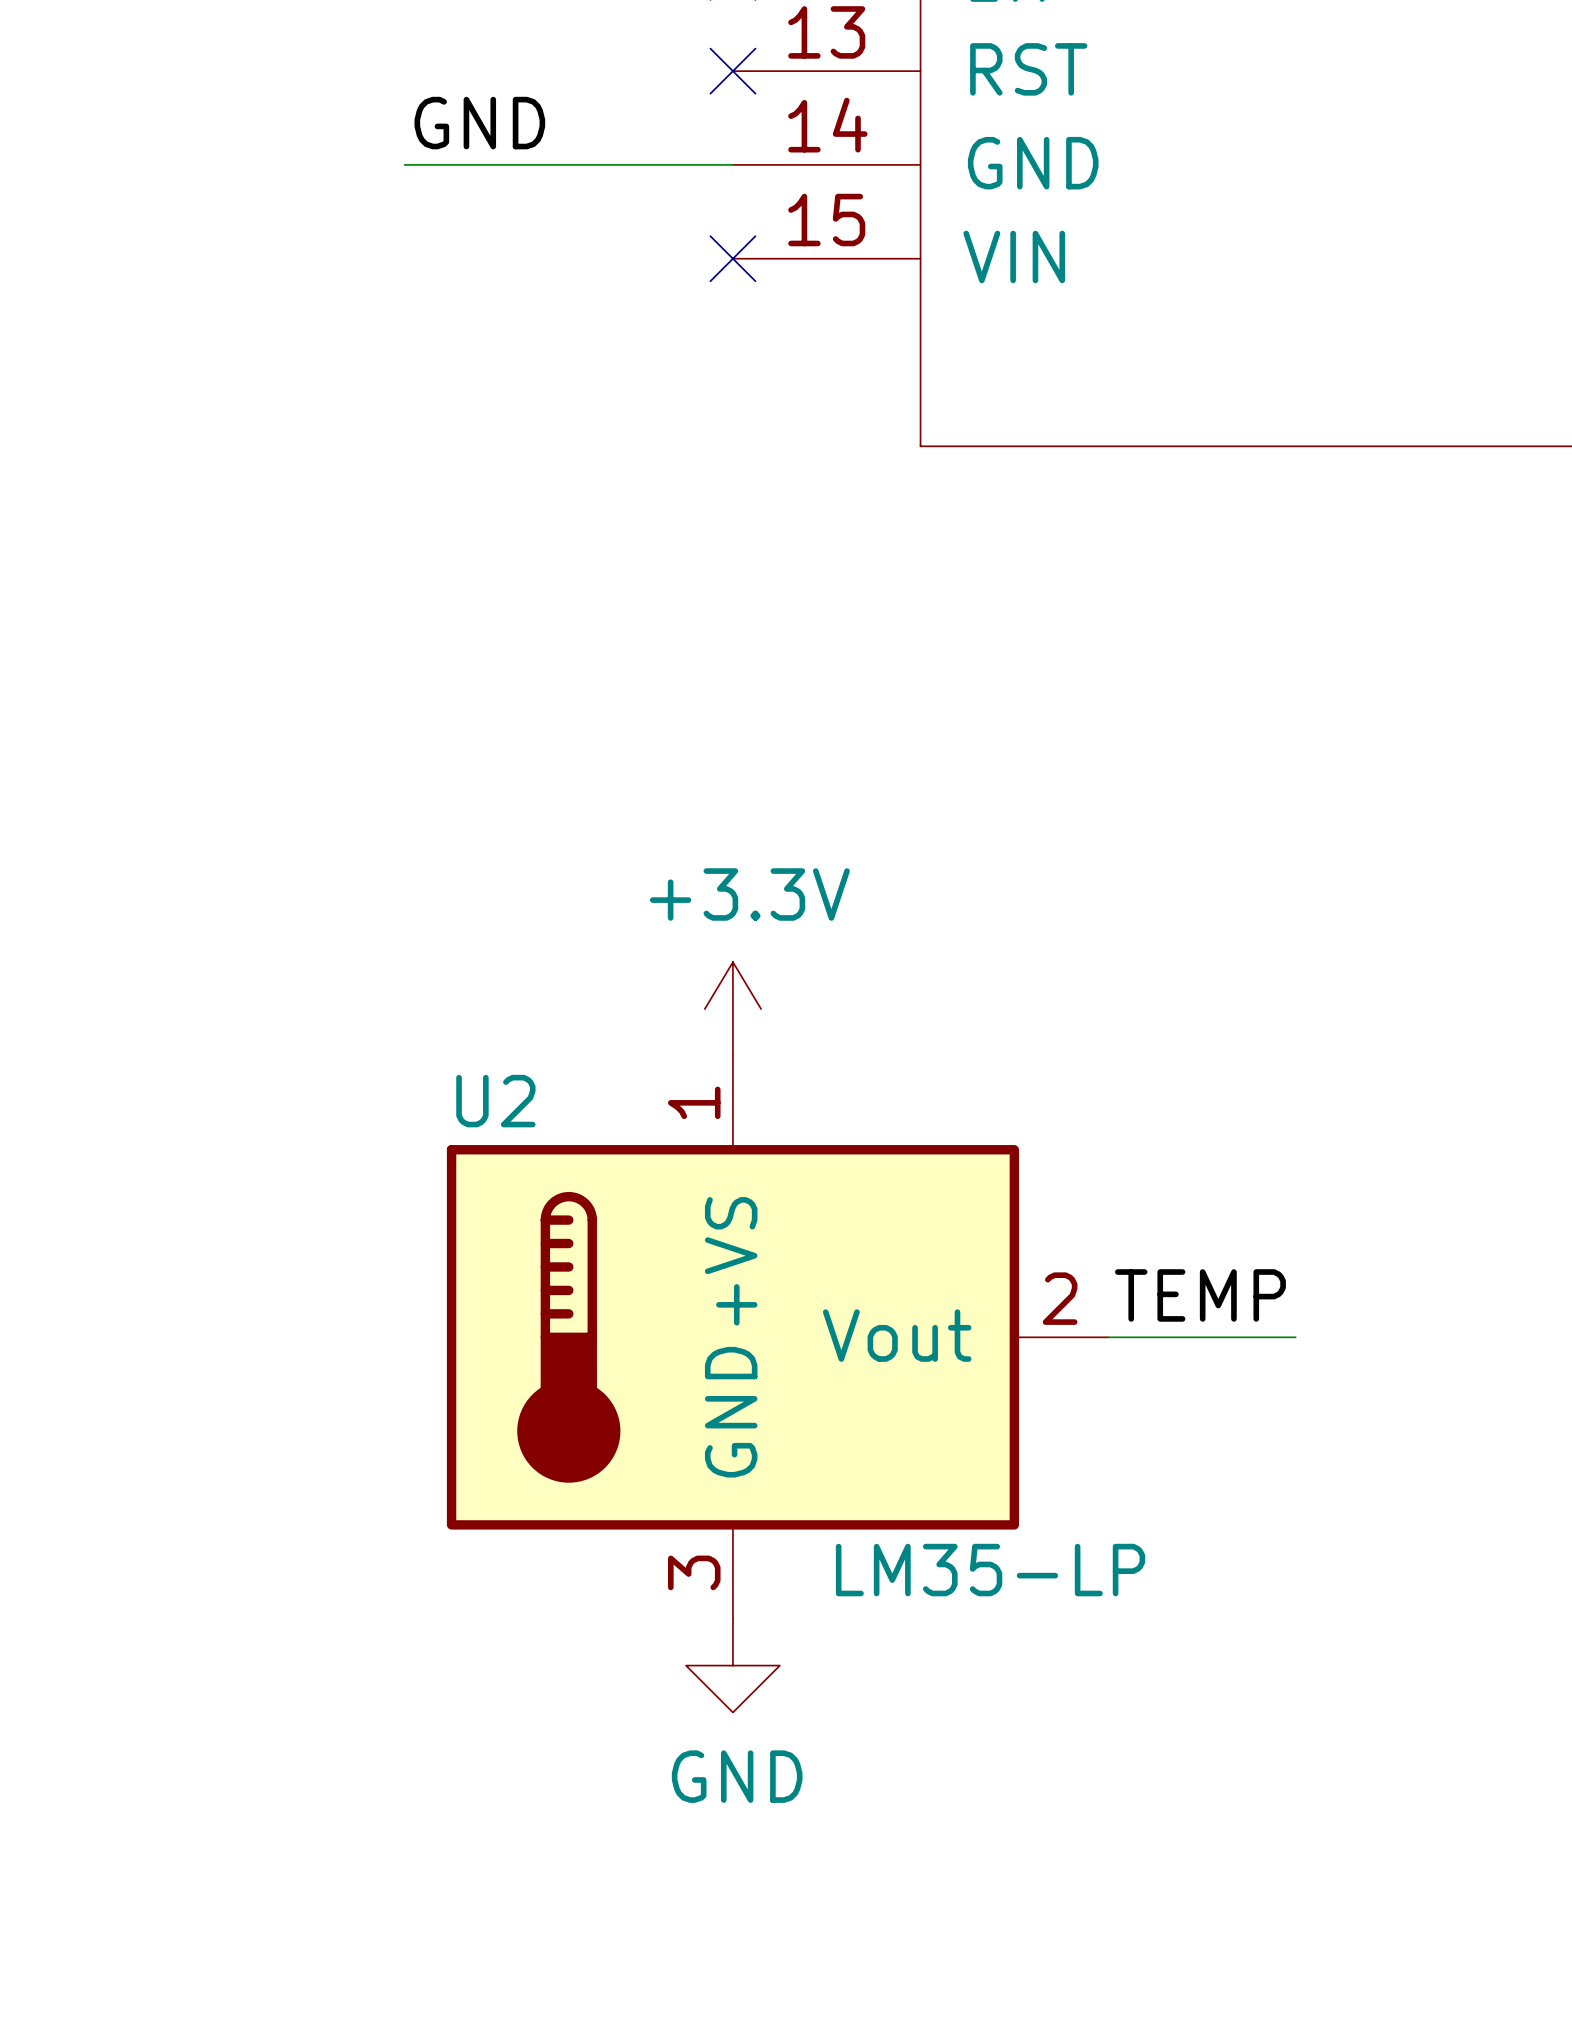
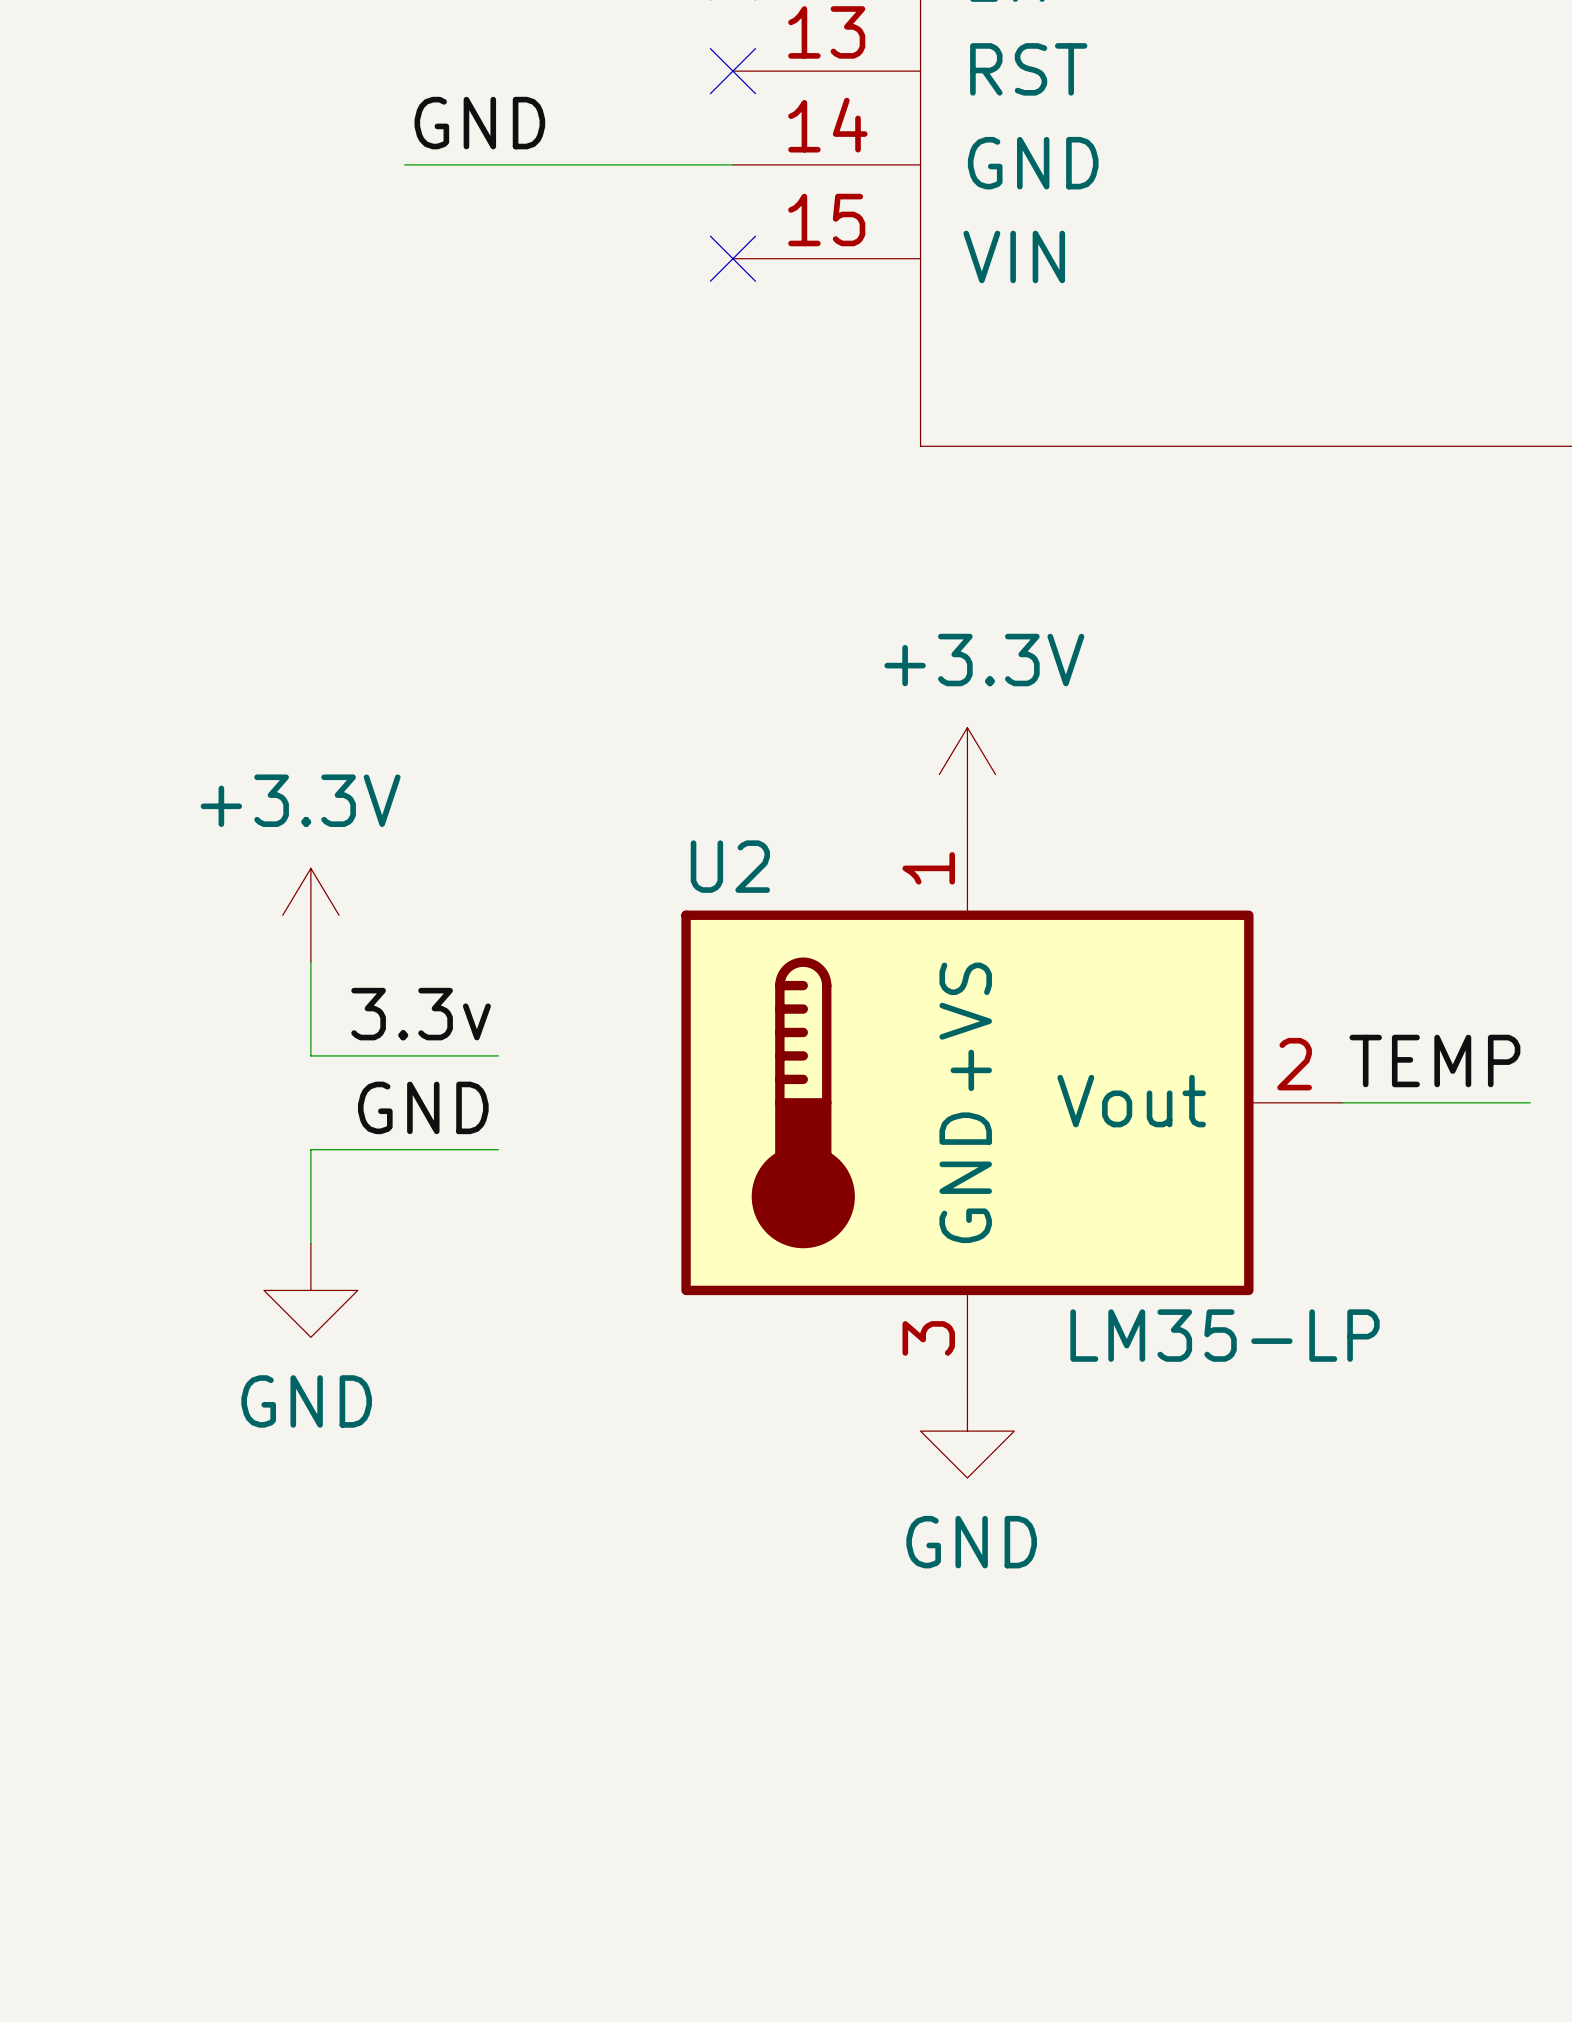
power symbol: none -> +3.3V (967, 774)
power symbol: none -> +3.3V (310, 915)
wire: none -> (310, 962) (310, 1055) (498, 1055)
power symbol: +3.3V (732, 1009) -> none
label: none -> 3.3v (421, 1014)
label: none -> GND (423, 1107)
wire: none -> (498, 1149) (310, 1149) (310, 1243)
power symbol: none -> GND (310, 1290)
label position: TEMP (1200, 1295) -> TEMP (1434, 1060)
U2 position: (777, 1337) -> (1011, 1102)
wire: (1108, 1337) (1295, 1337) -> (1342, 1102) (1530, 1102)
power symbol: none -> GND (967, 1431)
power symbol: GND (732, 1665) -> none

